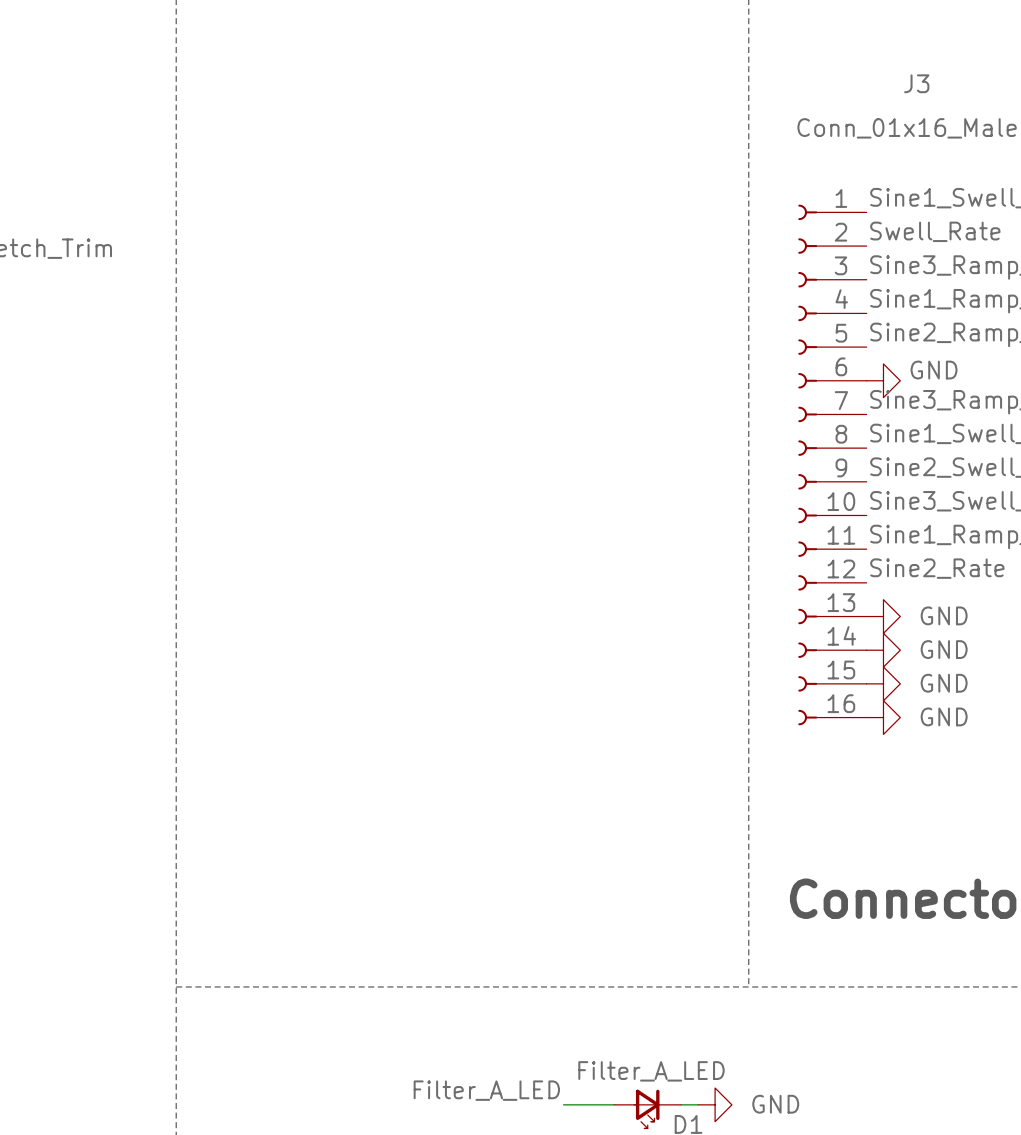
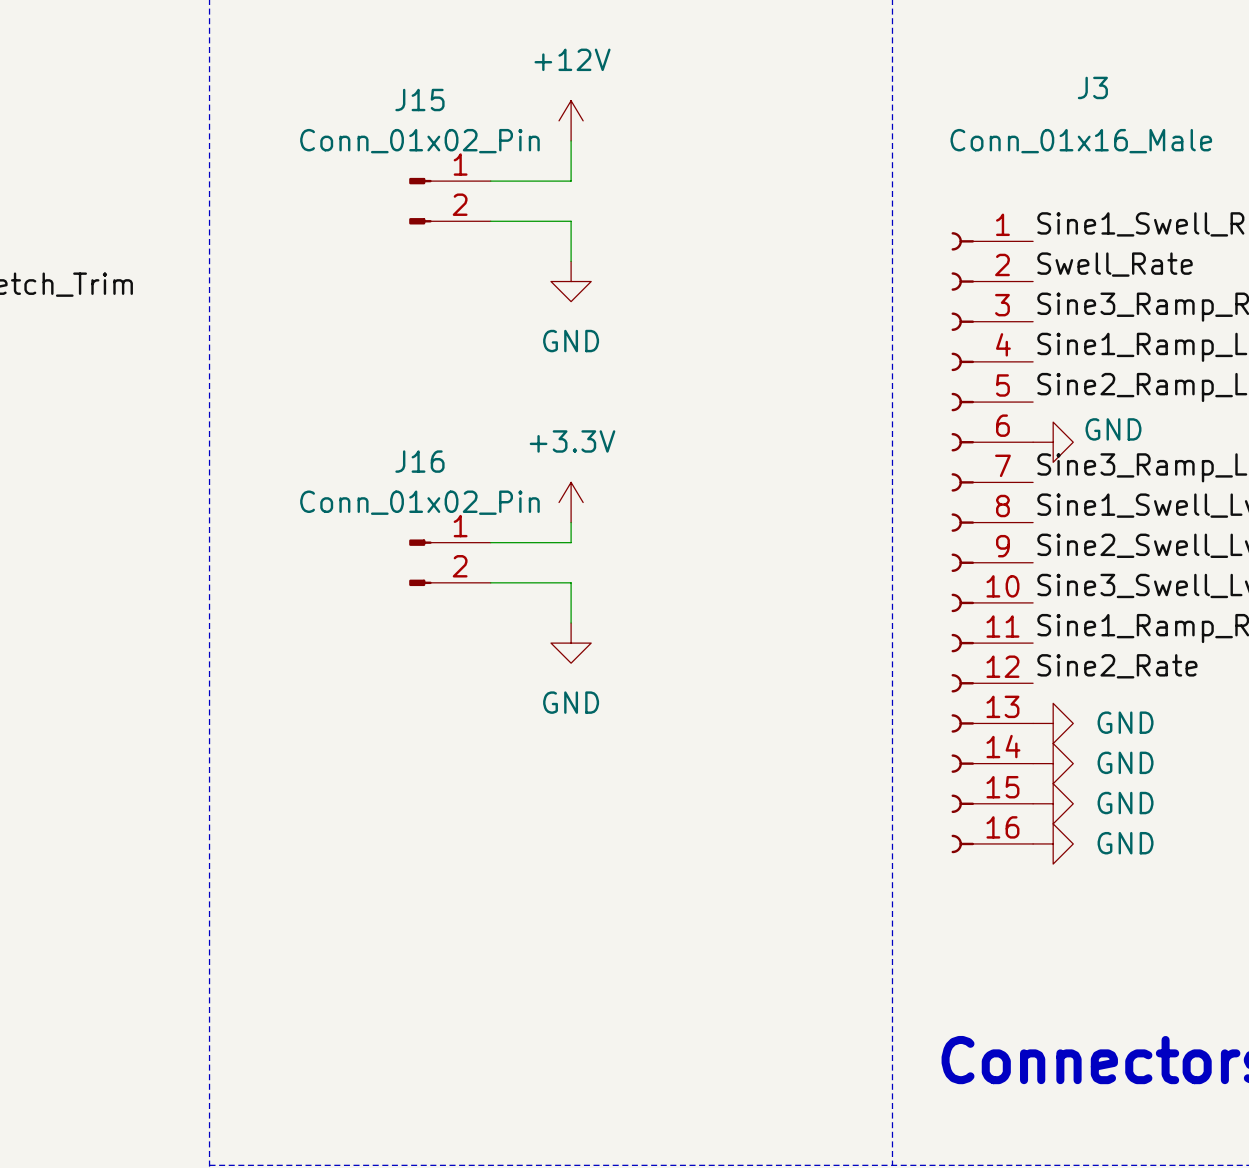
power symbol: none -> +12V (571, 120)
wire: none -> (571, 140) (571, 181) (490, 181)
J15: none -> Conn_01x02_Pin (449, 201)
wire: none -> (490, 221) (571, 221) (571, 261)
power symbol: none -> GND (571, 281)
power symbol: none -> +3.3V (571, 502)
wire: none -> (571, 522) (571, 542) (490, 542)
J16: none -> Conn_01x02_Pin (449, 562)
wire: none -> (490, 582) (571, 582) (571, 623)
power symbol: none -> GND (571, 643)

